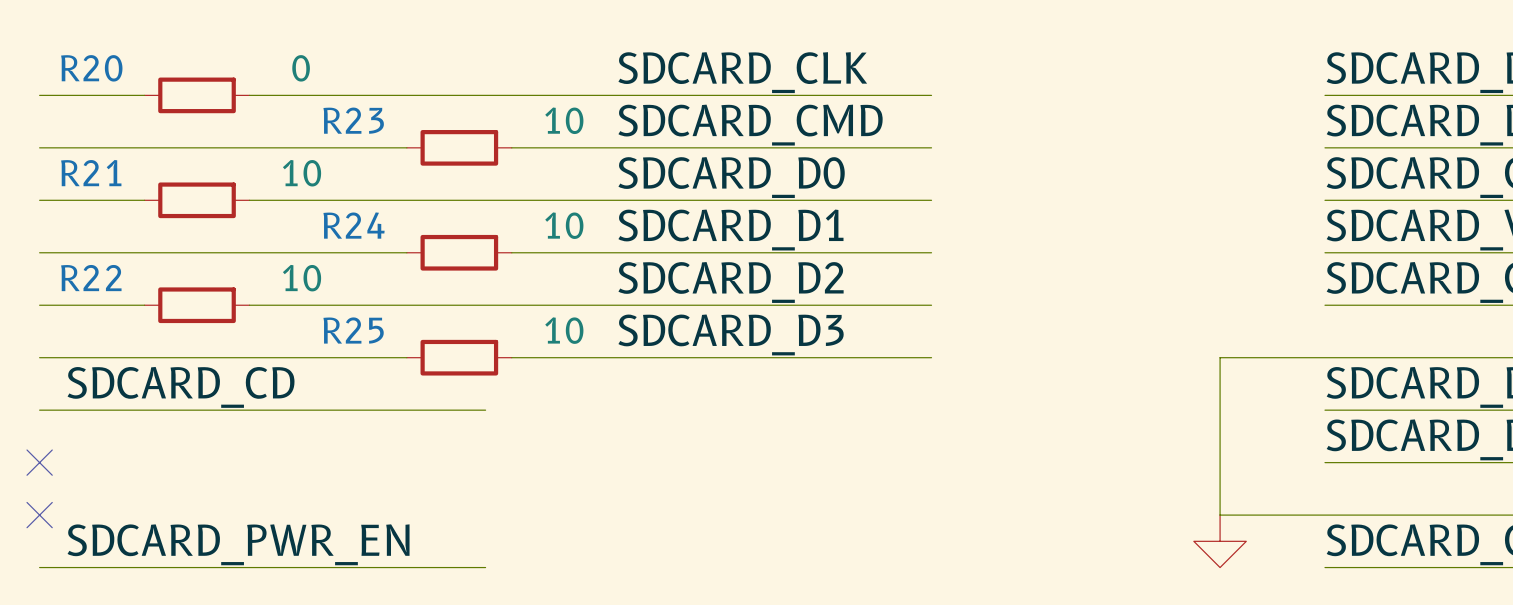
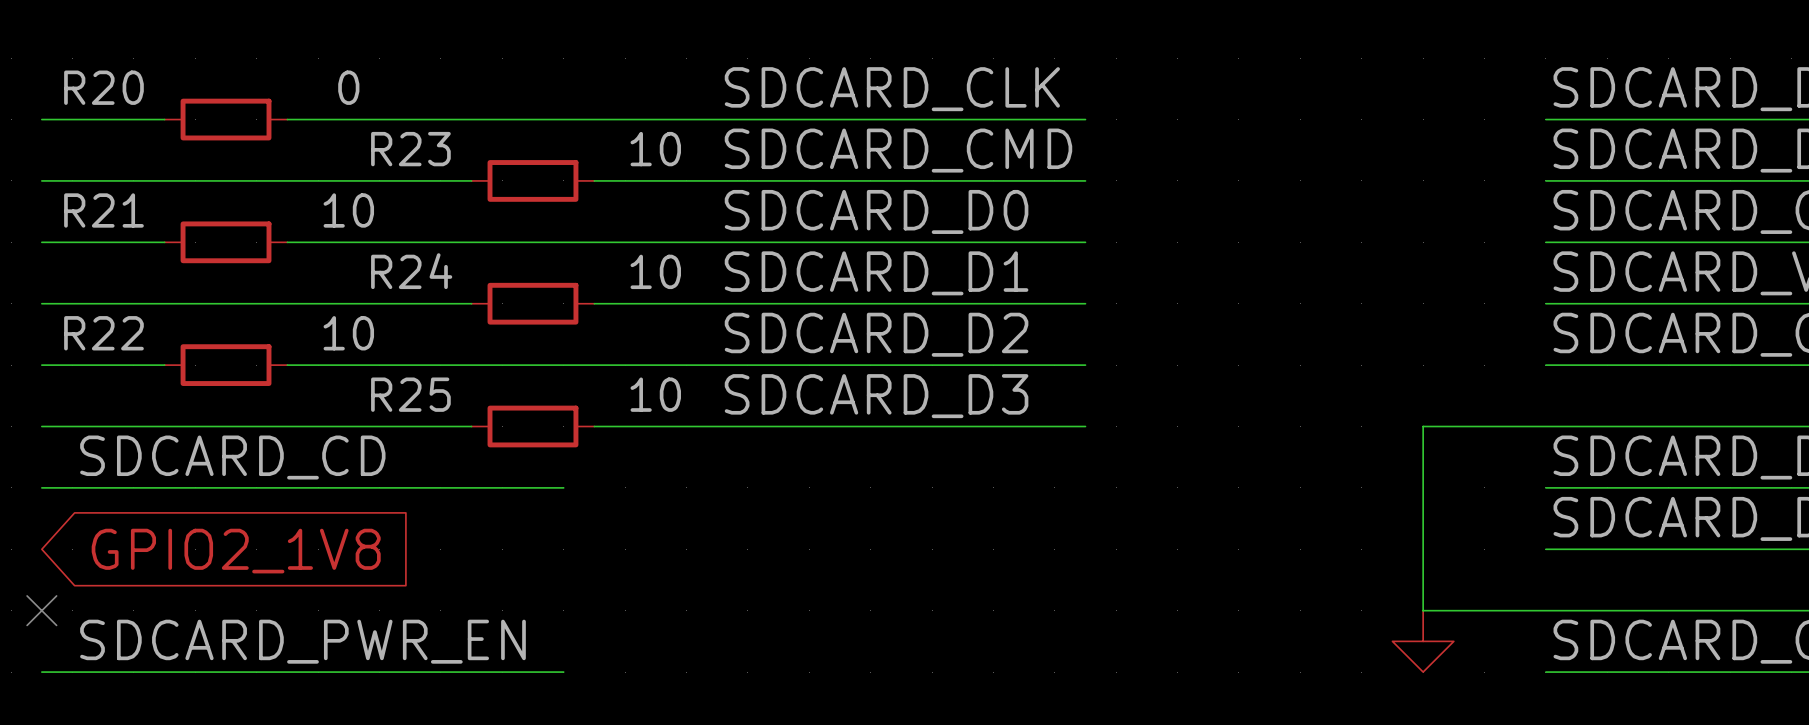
no-connect mark: (39, 462) -> none
global label: none -> GPIO2_1V8 (236, 551)

